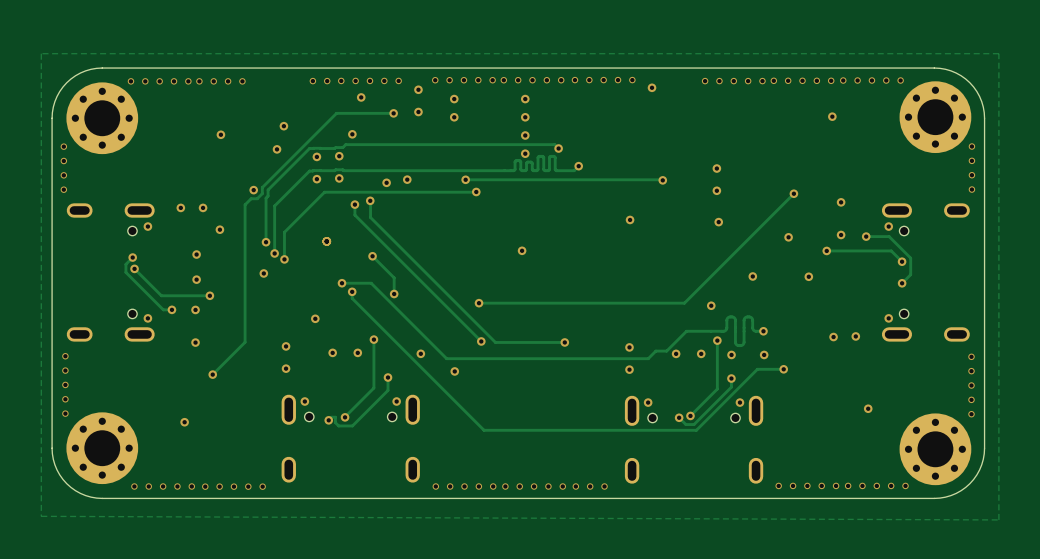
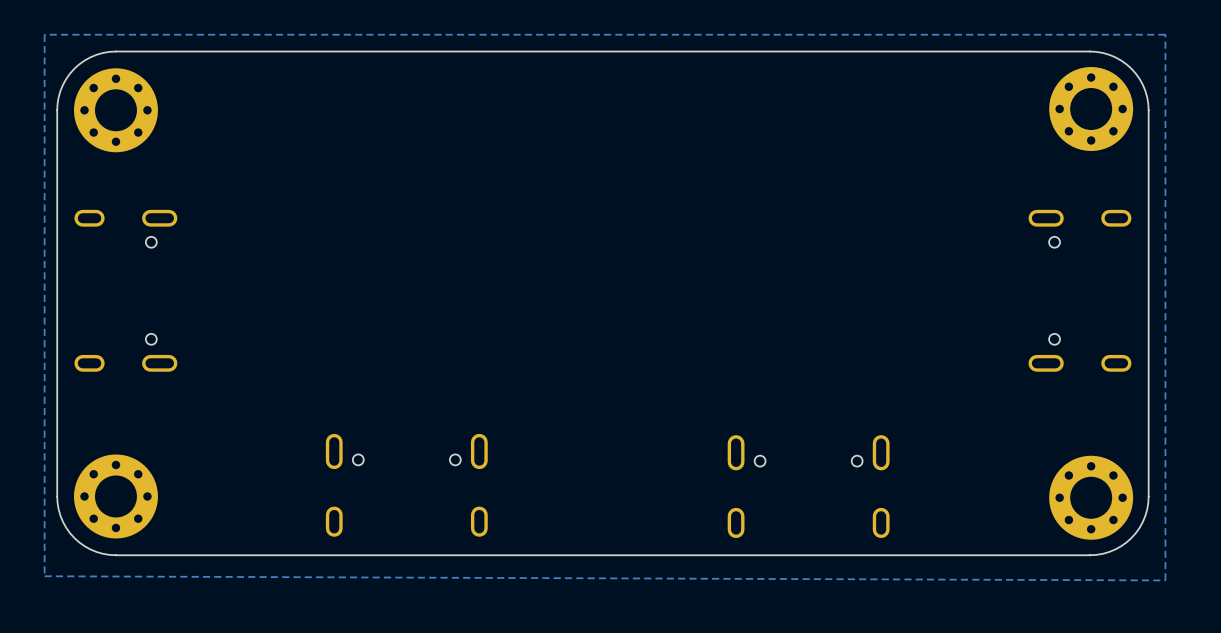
via: (341, 80) -> none
via: (355, 80) -> none
via: (369, 80) -> none
via: (384, 80) -> none
via: (398, 80) -> none
via: (435, 80) -> none
via: (449, 80) -> none
via: (463, 80) -> none
via: (478, 80) -> none
via: (492, 80) -> none
via: (503, 80) -> none
via: (518, 80) -> none
via: (532, 80) -> none
via: (546, 80) -> none
via: (561, 80) -> none
via: (574, 80) -> none
via: (589, 80) -> none
via: (603, 80) -> none
via: (618, 80) -> none
via: (632, 80) -> none
via: (773, 80) -> none
via: (788, 80) -> none
via: (802, 80) -> none
via: (816, 80) -> none
via: (831, 80) -> none
via: (843, 80) -> none
via: (857, 80) -> none
via: (871, 80) -> none
via: (886, 80) -> none
via: (900, 80) -> none
via: (130, 81) -> none
via: (145, 81) -> none
via: (159, 81) -> none
via: (174, 81) -> none
via: (188, 81) -> none
via: (199, 81) -> none
via: (213, 81) -> none
via: (228, 81) -> none
via: (242, 81) -> none
via: (312, 81) -> none
via: (327, 81) -> none
via: (705, 81) -> none
via: (719, 81) -> none
via: (733, 81) -> none
via: (748, 81) -> none
via: (762, 81) -> none
via: (652, 87) -> none
via: (418, 89) -> none
via: (361, 97) -> none
via: (454, 99) -> none
via: (525, 99) -> none
via: (418, 112) -> none
track: (393, 113) (336, 113) (262, 187) (262, 193) (257, 198) (251, 198) (245, 204) (245, 342) (212, 374) -> none
via: (393, 113) -> none
via: (832, 116) -> none
via: (454, 117) -> none
via: (525, 117) -> none
via: (283, 126) -> none
via: (220, 134) -> none
via: (352, 134) -> none
via: (525, 135) -> none
via: (63, 146) -> none
via: (971, 146) -> none
track: (558, 148) (554, 144) (345, 144) (342, 147) (334, 148) (309, 148) (268, 189) (266, 198) (266, 242) -> none
via: (558, 148) -> none
via: (277, 149) -> none
via: (525, 153) -> none
via: (316, 156) -> none
via: (339, 156) -> none
via: (63, 160) -> none
via: (971, 160) -> none
track: (578, 166) (574, 170) (556, 170) (555, 157) (550, 156) (549, 169) (544, 170) (543, 157) (539, 156) (536, 170) (532, 170) (530, 162) (526, 162) (526, 170) (521, 170) (520, 161) (516, 160) (513, 170) (320, 170) -> none
via: (578, 166) -> none
via: (716, 168) -> none
track: (320, 170) (309, 171) (274, 205) (274, 253) -> none
via: (63, 175) -> none
via: (971, 175) -> none
via: (339, 178) -> none
via: (316, 179) -> none
via: (407, 179) -> none
track: (465, 179) (662, 180) -> none
via: (465, 179) -> none
via: (662, 180) -> none
via: (386, 182) -> none
via: (63, 189) -> none
via: (971, 189) -> none
via: (253, 190) -> none
via: (716, 190) -> none
track: (476, 191) (324, 192) (284, 232) (284, 259) -> none
via: (476, 191) -> none
track: (793, 193) (684, 303) (479, 303) -> none
via: (793, 193) -> none
track: (370, 200) (370, 217) (495, 342) (564, 342) -> none
via: (370, 200) -> none
via: (841, 202) -> none
track: (354, 204) (354, 215) (481, 341) -> none
via: (354, 204) -> none
via: (180, 207) -> none
via: (203, 207) -> none
via: (630, 219) -> none
via: (718, 222) -> none
via: (147, 226) -> none
via: (888, 226) -> none
via: (219, 229) -> none
via: (841, 234) -> none
track: (866, 236) (889, 236) (910, 258) (910, 274) (902, 283) -> none
via: (866, 236) -> none
via: (788, 237) -> none
via: (326, 241) -> none
via: (266, 242) -> none
via: (522, 250) -> none
track: (826, 250) (891, 250) (902, 261) -> none
via: (826, 250) -> none
via: (274, 253) -> none
via: (196, 254) -> none
track: (372, 256) (394, 277) (394, 294) -> none
via: (372, 256) -> none
track: (132, 257) (125, 264) (125, 272) (163, 309) (171, 309) -> none
via: (132, 257) -> none
via: (284, 259) -> none
via: (902, 261) -> none
track: (134, 268) (161, 295) (209, 295) -> none
via: (134, 268) -> none
via: (263, 273) -> none
via: (752, 276) -> none
via: (808, 276) -> none
via: (196, 279) -> none
track: (342, 283) (371, 283) (446, 358) (648, 358) (655, 351) (666, 351) (686, 331) (724, 330) (727, 319) (729, 317) (735, 319) (735, 342) (737, 345) (743, 343) (744, 319) (746, 317) (752, 318) (753, 330) (763, 331) -> none
via: (342, 283) -> none
via: (902, 283) -> none
track: (352, 291) (352, 298) (484, 430) (696, 430) (757, 369) (783, 369) -> none
via: (352, 291) -> none
via: (394, 294) -> none
via: (209, 295) -> none
via: (479, 303) -> none
via: (711, 305) -> none
via: (171, 309) -> none
via: (195, 309) -> none
via: (147, 318) -> none
via: (315, 318) -> none
via: (888, 318) -> none
via: (763, 331) -> none
via: (855, 336) -> none
via: (833, 337) -> none
track: (373, 339) (373, 388) (345, 417) -> none
via: (373, 339) -> none
track: (717, 340) (717, 389) (690, 415) -> none
via: (717, 340) -> none
via: (481, 341) -> none
via: (195, 342) -> none
via: (564, 342) -> none
via: (286, 346) -> none
via: (629, 347) -> none
via: (332, 352) -> none
via: (357, 352) -> none
via: (420, 353) -> none
via: (676, 353) -> none
via: (701, 353) -> none
via: (731, 354) -> none
via: (764, 354) -> none
via: (65, 356) -> none
via: (971, 356) -> none
via: (286, 368) -> none
via: (629, 369) -> none
via: (783, 369) -> none
via: (65, 370) -> none
via: (454, 371) -> none
via: (971, 371) -> none
via: (212, 374) -> none
track: (388, 377) (388, 390) (352, 425) (338, 425) (335, 422) (335, 417) (331, 417) (328, 420) -> none
via: (388, 377) -> none
track: (731, 378) (731, 387) (694, 424) (685, 424) (679, 417) -> none
via: (731, 378) -> none
via: (65, 384) -> none
via: (971, 385) -> none
via: (65, 399) -> none
via: (971, 399) -> none
via: (304, 401) -> none
via: (396, 401) -> none
via: (648, 402) -> none
via: (739, 402) -> none
via: (868, 408) -> none
via: (65, 413) -> none
via: (971, 414) -> none
via: (690, 415) -> none
via: (345, 417) -> none
via: (679, 417) -> none
via: (328, 420) -> none
via: (184, 422) -> none
via: (778, 485) -> none
via: (793, 485) -> none
via: (807, 485) -> none
via: (821, 485) -> none
via: (836, 485) -> none
via: (848, 485) -> none
via: (862, 485) -> none
via: (876, 485) -> none
via: (891, 485) -> none
via: (905, 485) -> none
via: (134, 486) -> none
via: (148, 486) -> none
via: (163, 486) -> none
via: (177, 486) -> none
via: (191, 486) -> none
via: (205, 486) -> none
via: (219, 486) -> none
via: (233, 486) -> none
via: (248, 486) -> none
via: (262, 486) -> none
via: (435, 486) -> none
via: (450, 486) -> none
via: (464, 486) -> none
via: (478, 486) -> none
via: (493, 486) -> none
via: (505, 486) -> none
via: (519, 486) -> none
via: (534, 486) -> none
via: (548, 486) -> none
via: (562, 486) -> none
via: (575, 486) -> none
via: (590, 486) -> none
via: (604, 486) -> none

